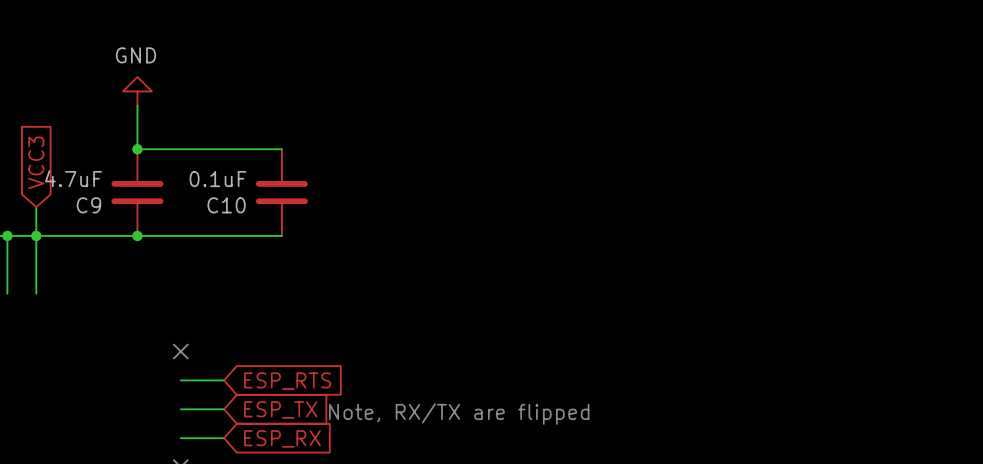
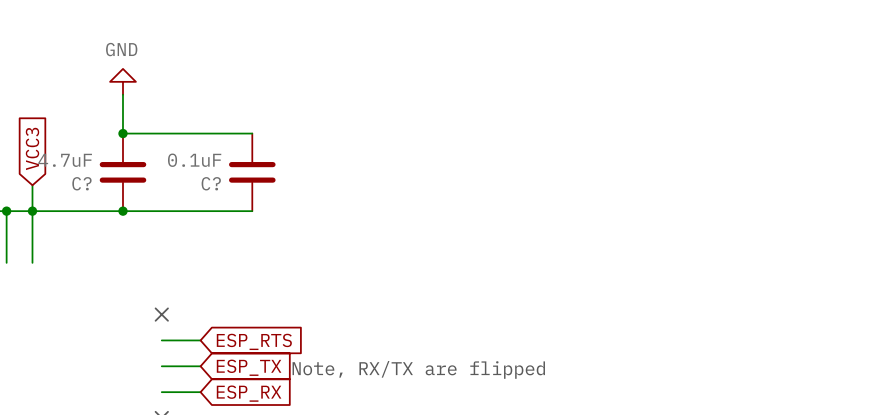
C9 name: C9 (88, 205) -> C? (81, 183)
C10 name: C10 (226, 205) -> C? (211, 183)

